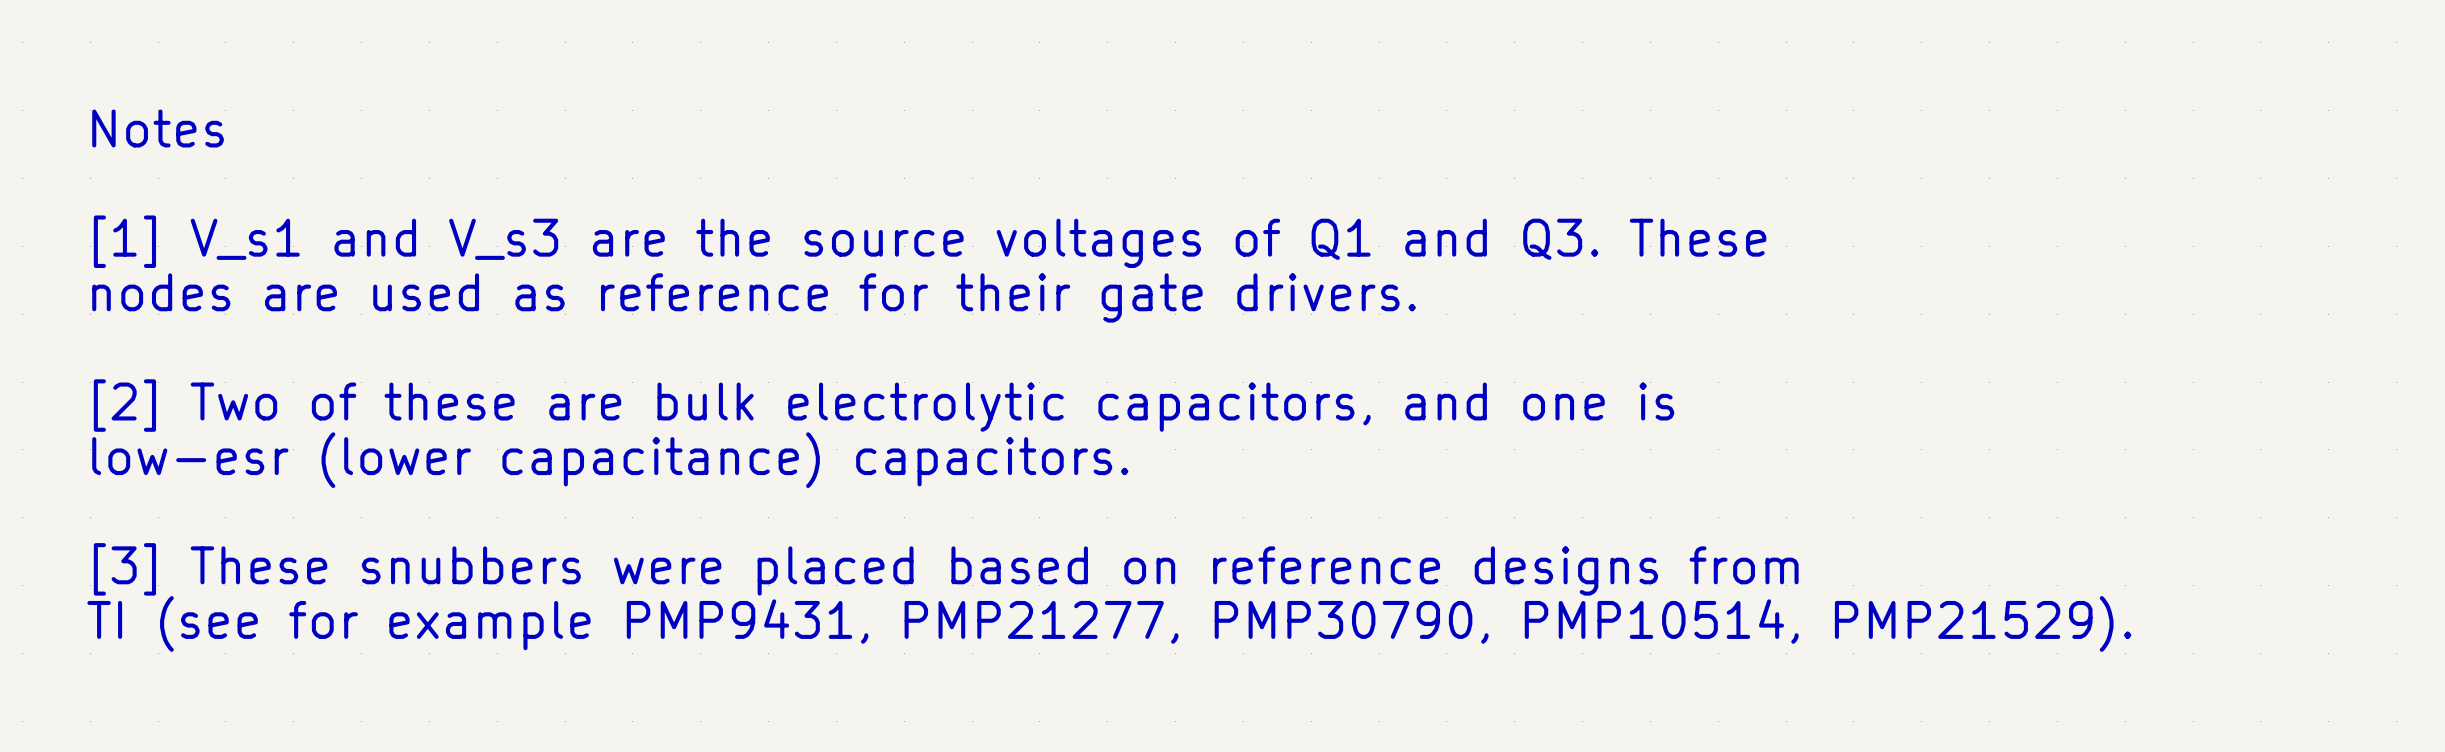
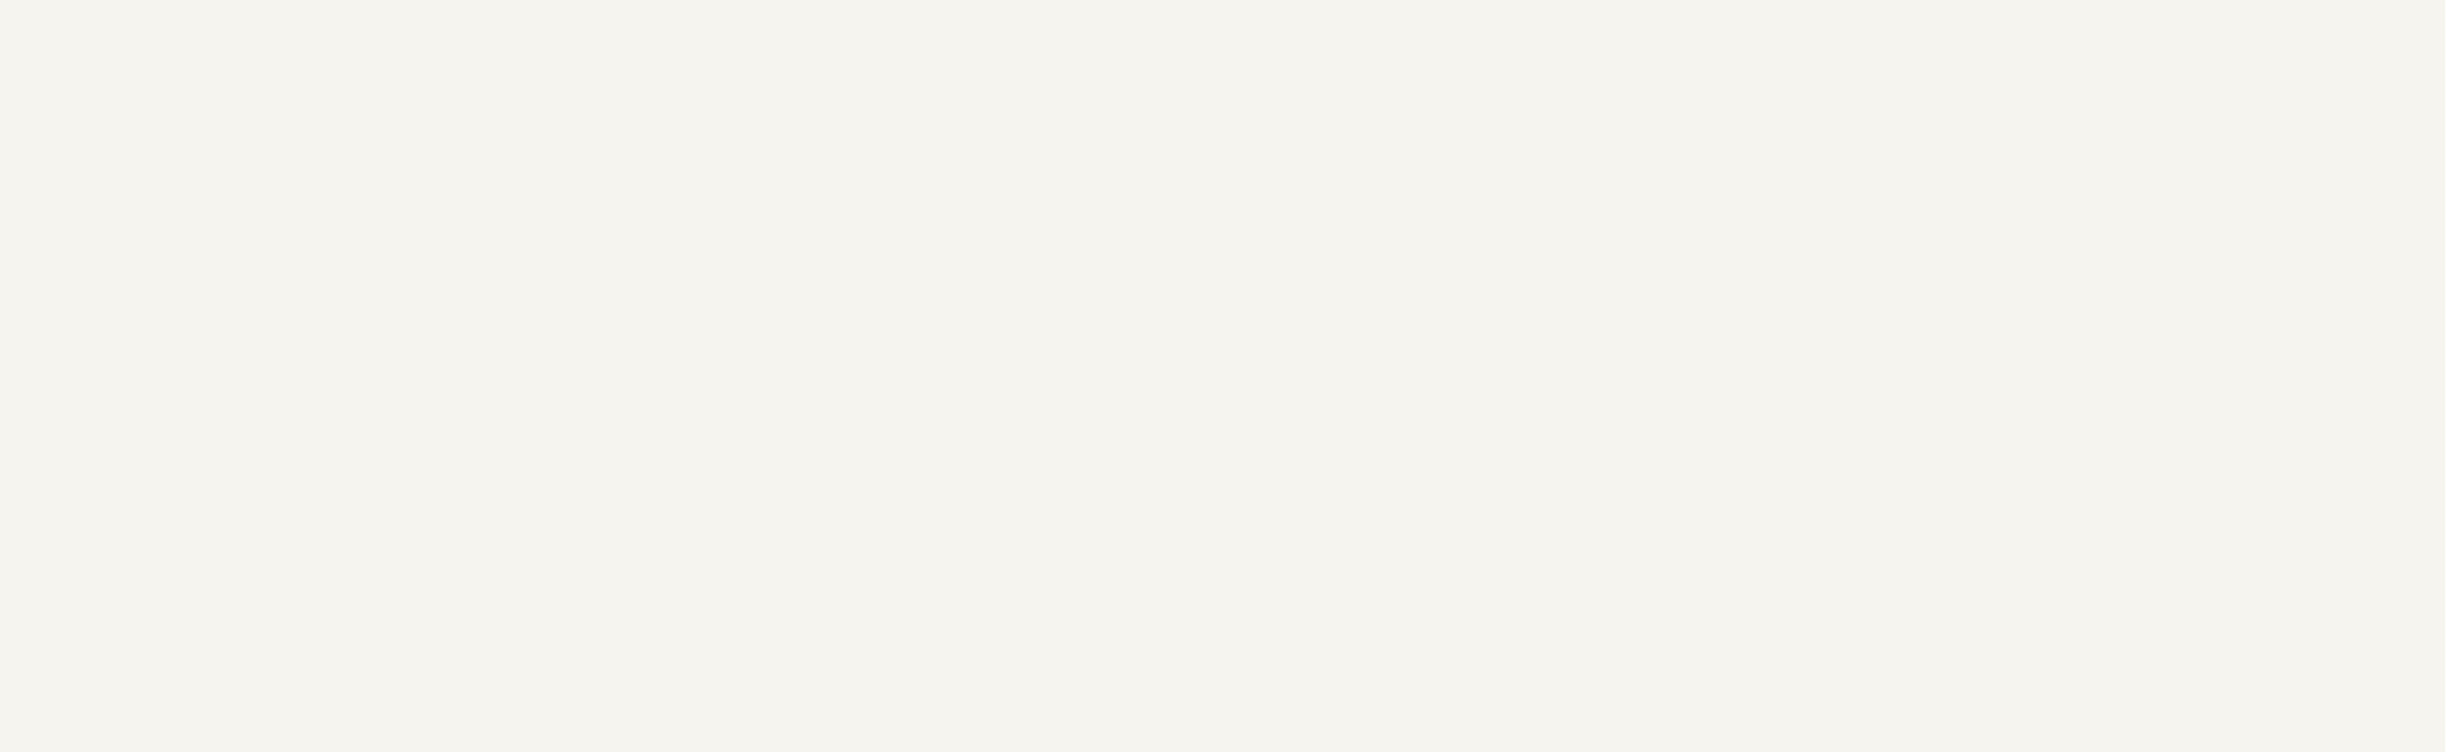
text: Notes (158, 128) -> none
text: [1] V_s1 and V_s3 are the source voltages of Q1 and Q3. These (930, 241) -> none
text: nodes are used as reference for their gate drivers. (754, 297) -> none
text: [2] Two of these are bulk electrolytic capacitors, and one is (884, 405) -> none
text: low-esr (lower capacitance) capacitors. (610, 460) -> none
text: [3] These snubbers were placed based on reference designs from (946, 569) -> none
text: TI (see for example PMP9431, PMP21277, PMP30790, PMP10514, PMP21529). (1109, 623) -> none

